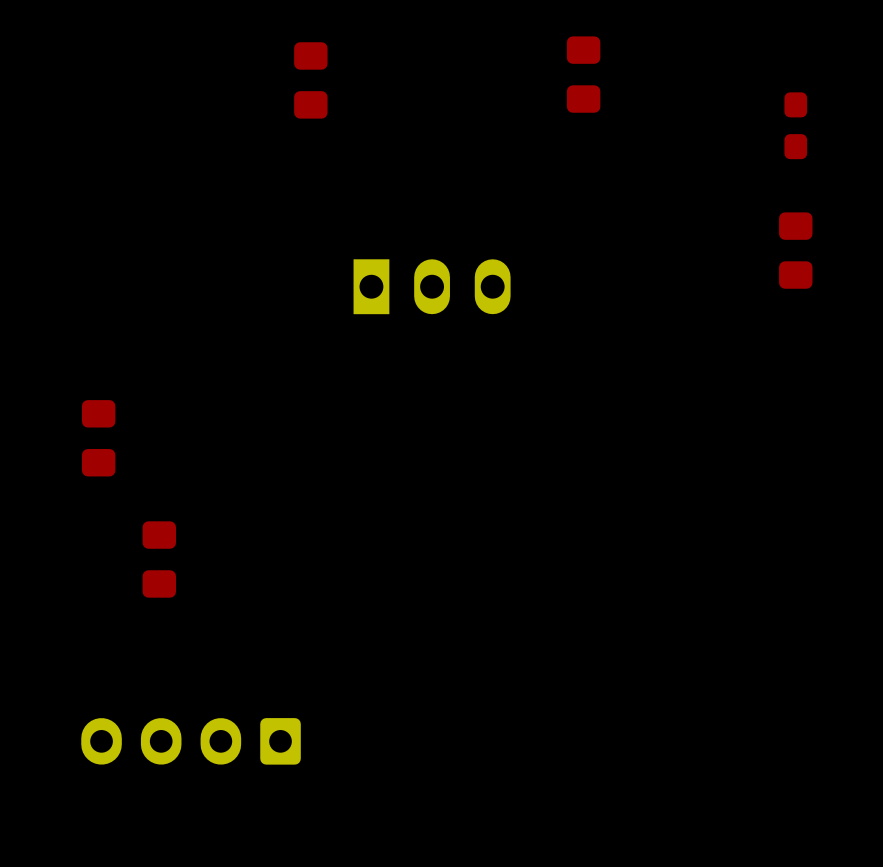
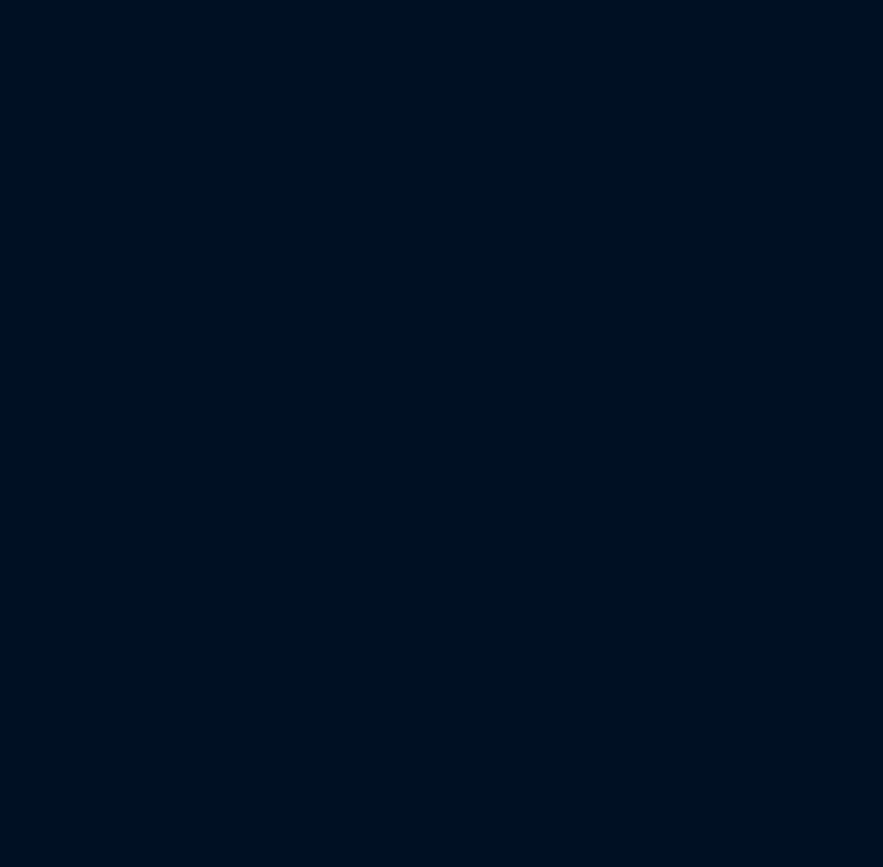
part: (583, 74) -> none
part: (310, 80) -> none
part: (795, 125) -> none
part: (795, 250) -> none
part: (432, 286) -> none
part: (98, 438) -> none
part: (159, 559) -> none
part: (191, 741) -> none

